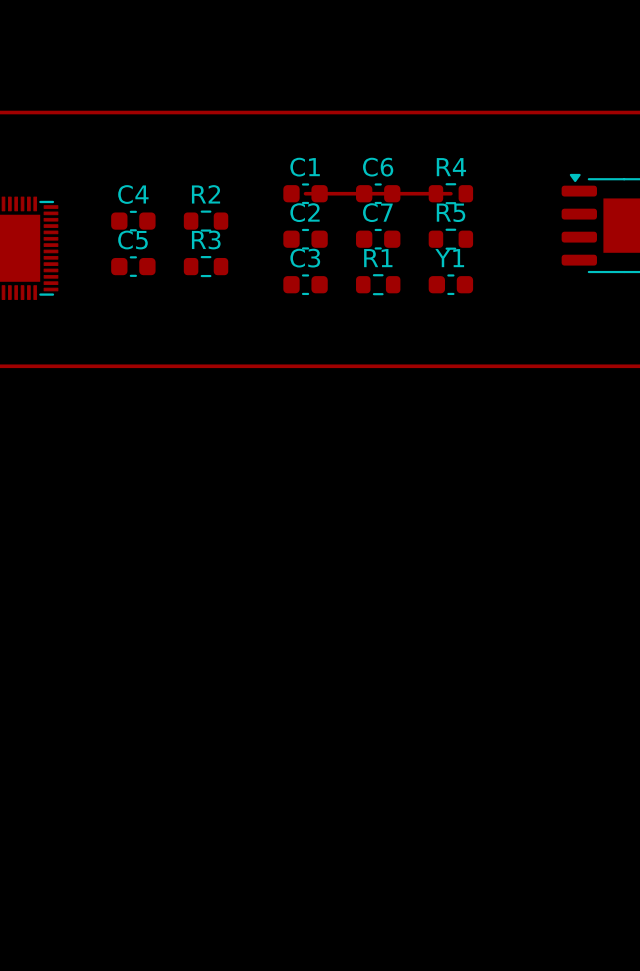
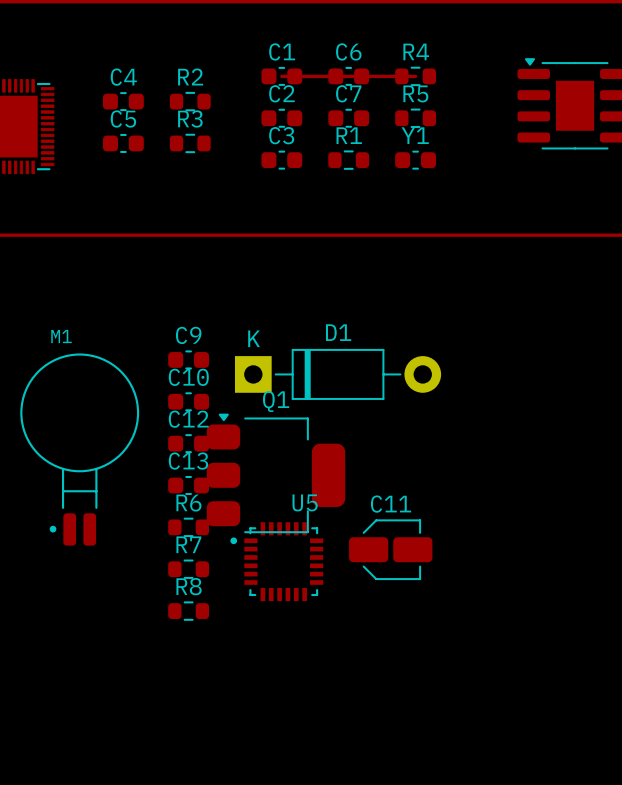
C9: none -> (188, 359)
D1: none -> (338, 374)
C10: none -> (188, 401)
C12: none -> (188, 443)
M1: none -> (79, 449)
Q1: none -> (276, 473)
C13: none -> (188, 485)
R6: none -> (188, 527)
C11: none -> (390, 549)
U5: none -> (276, 561)
R7: none -> (188, 569)
R8: none -> (188, 611)

